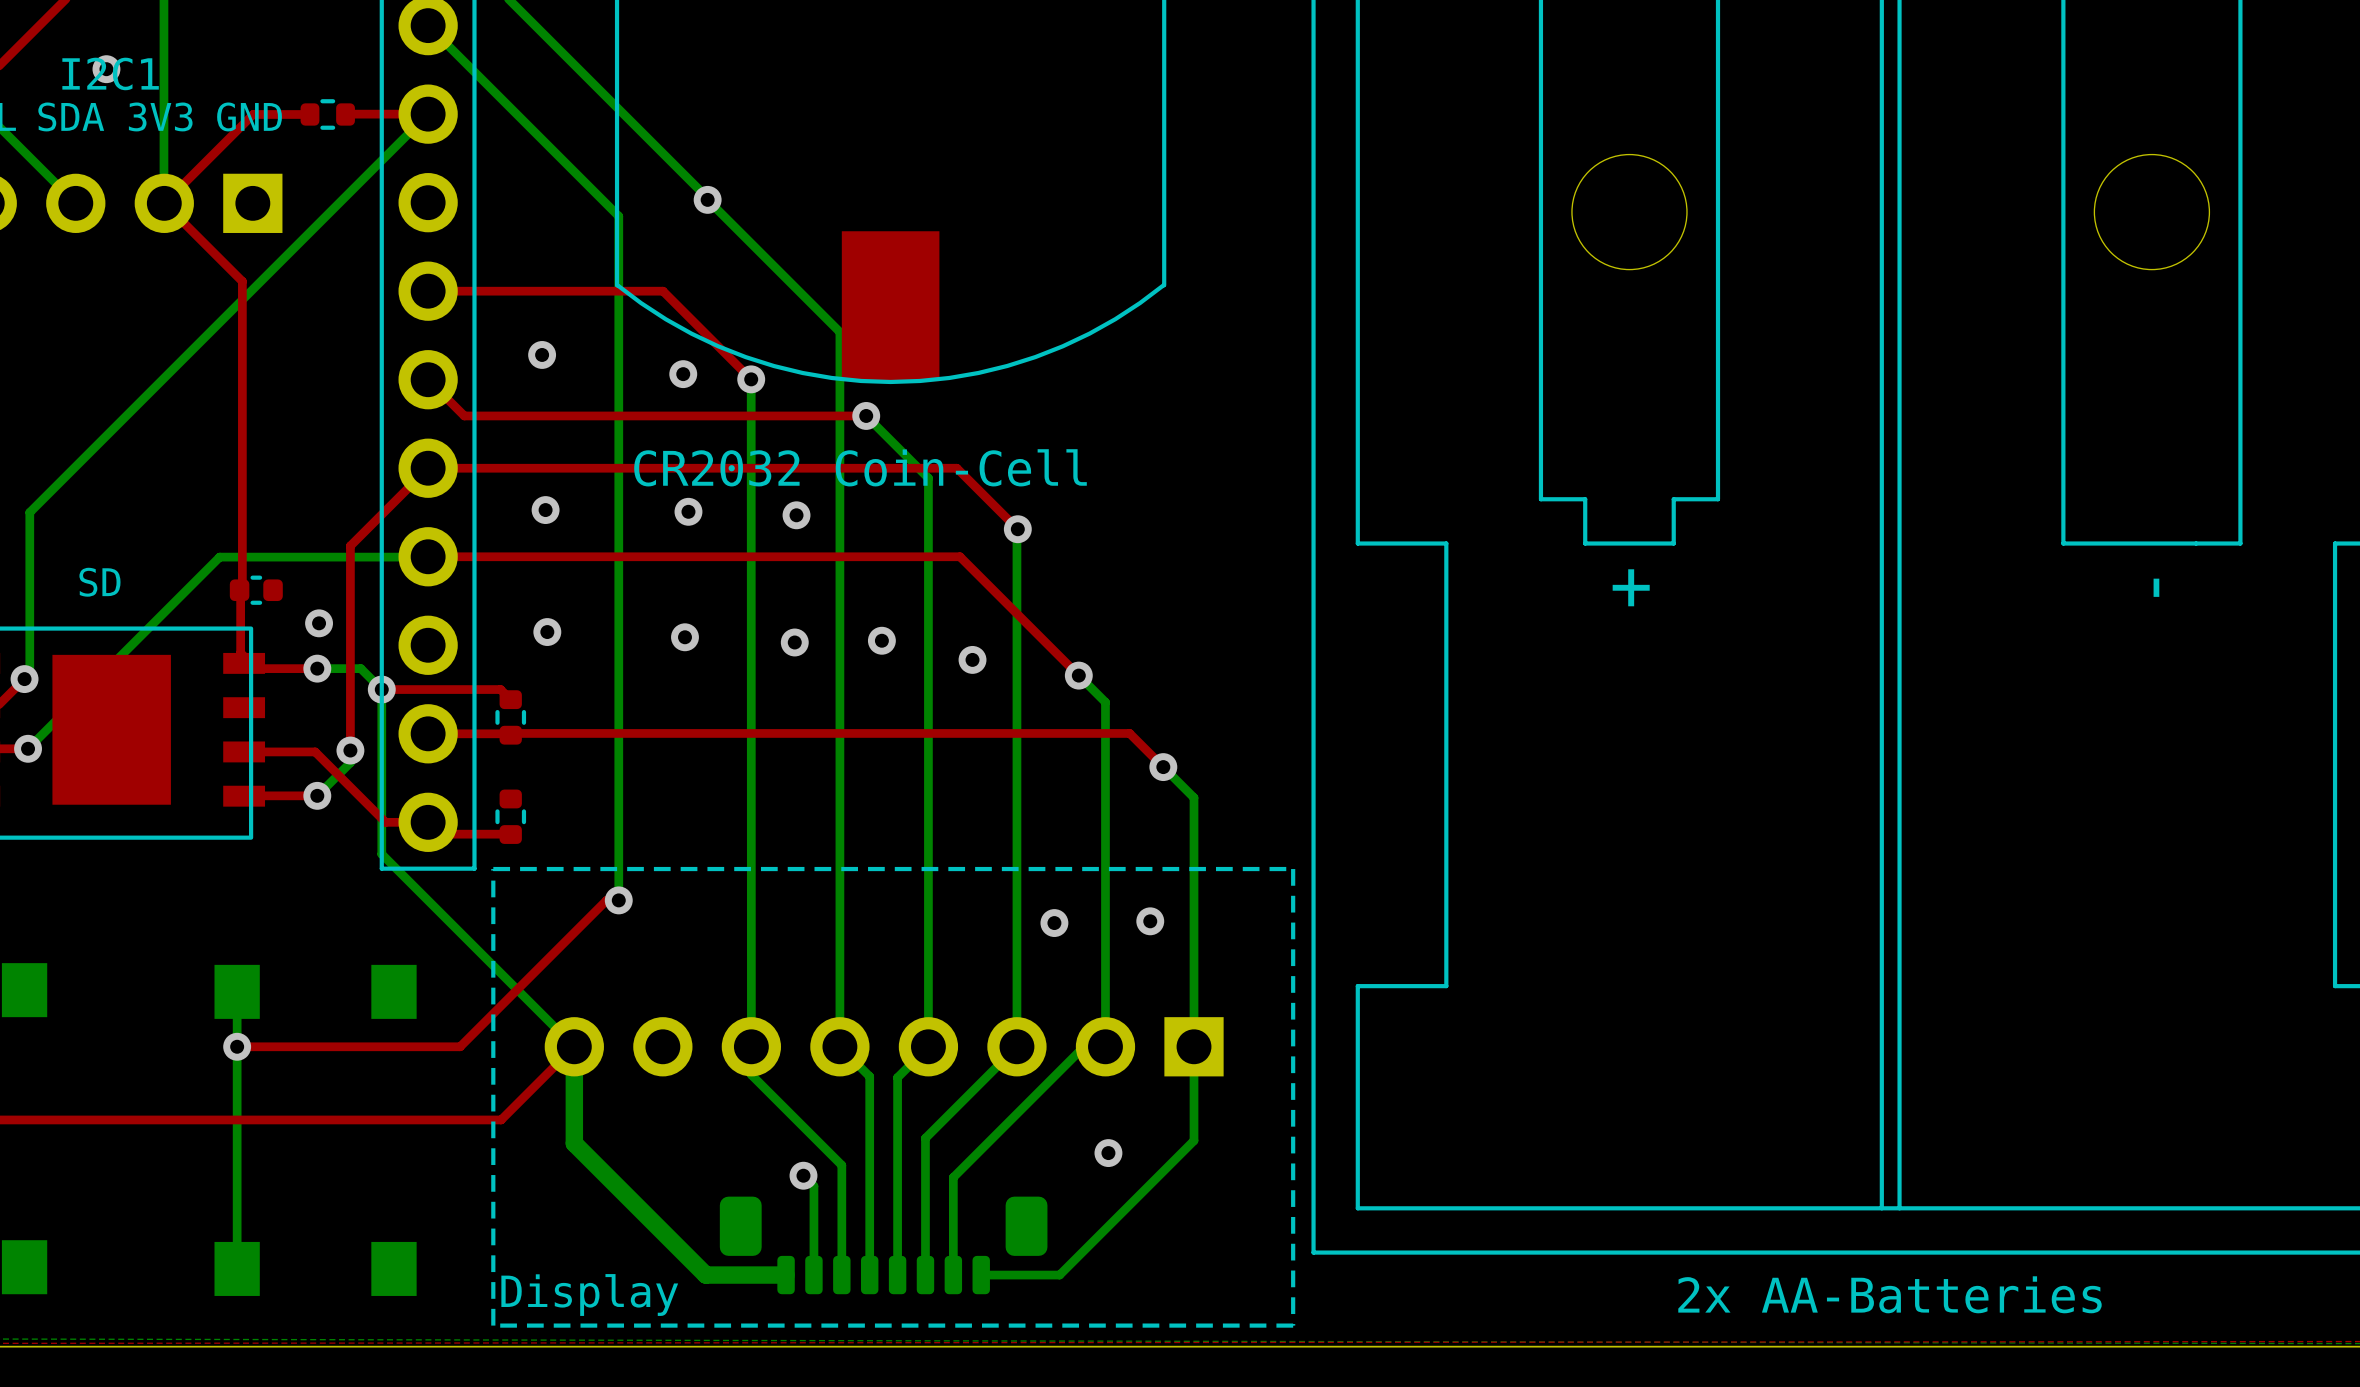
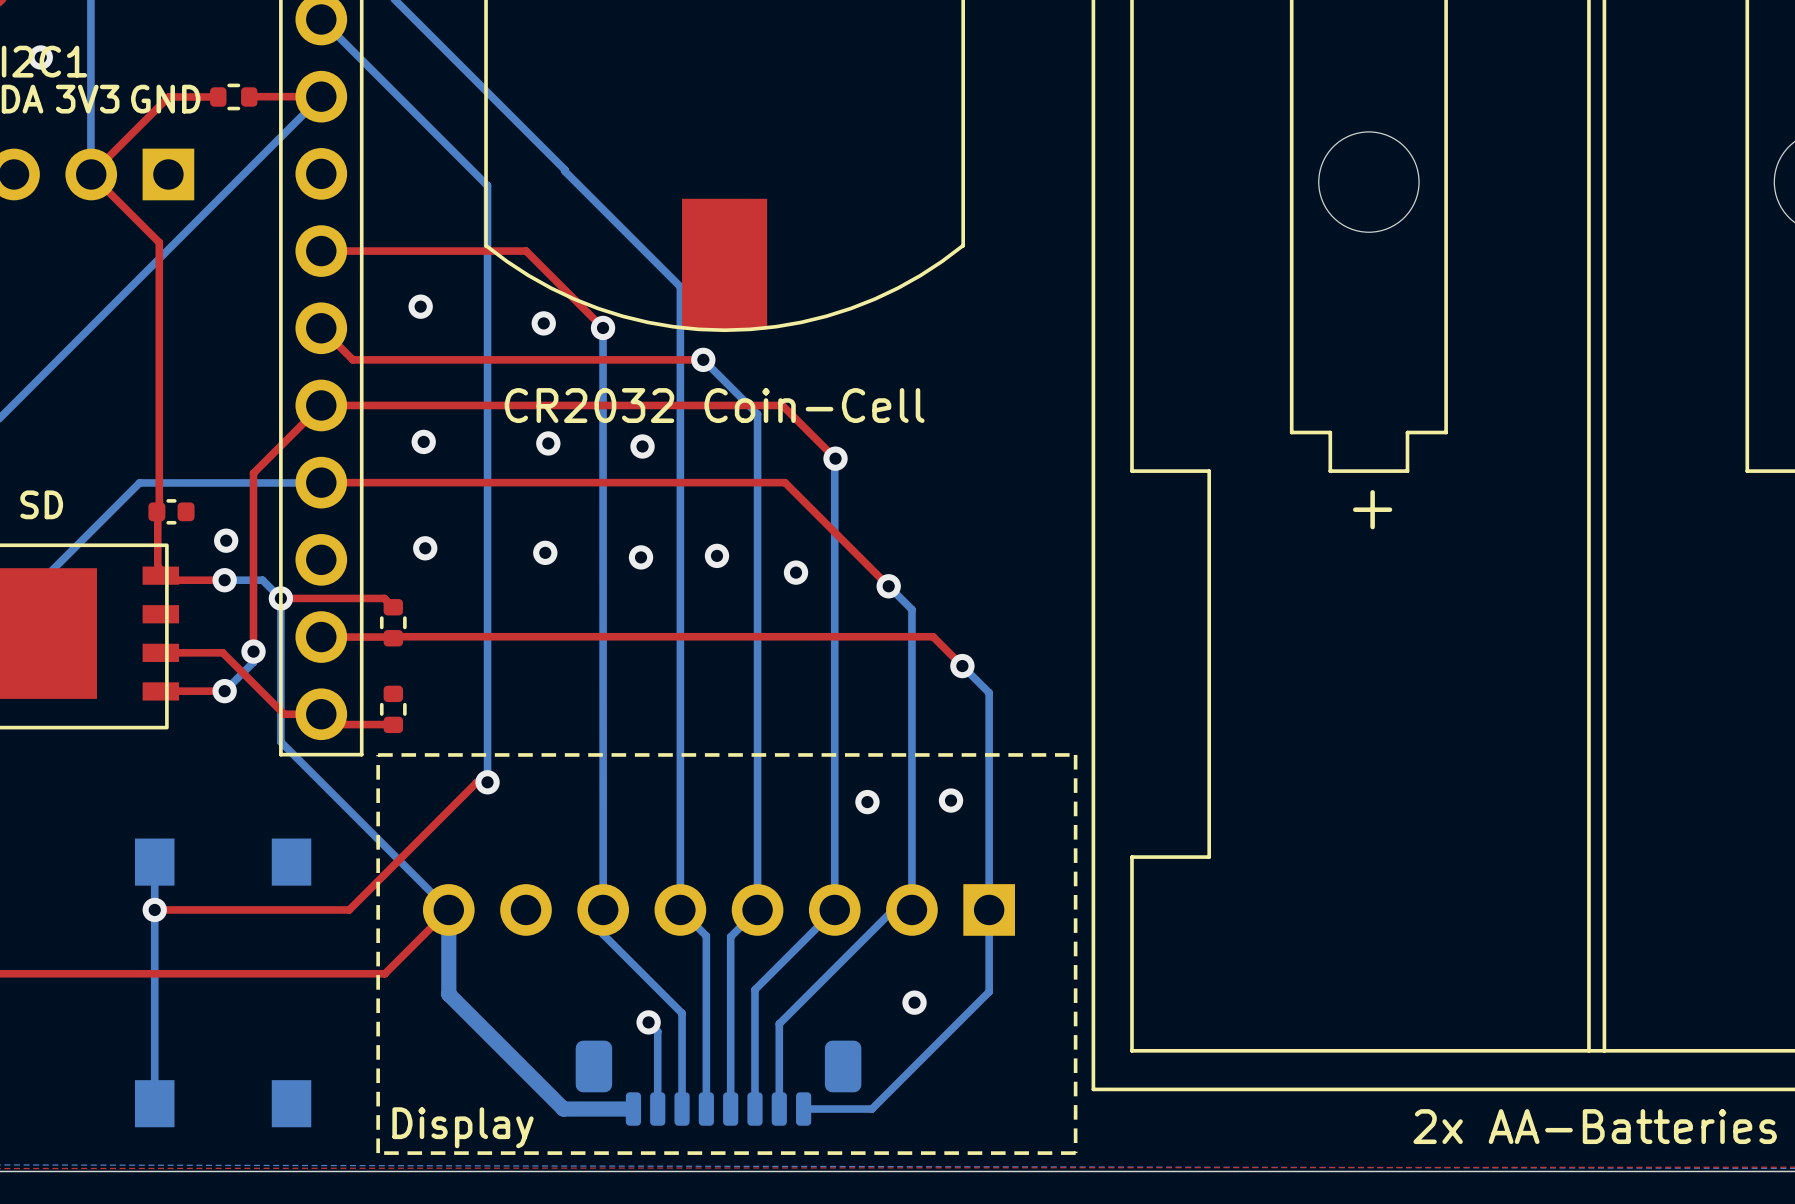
via: (707, 199) -> none

